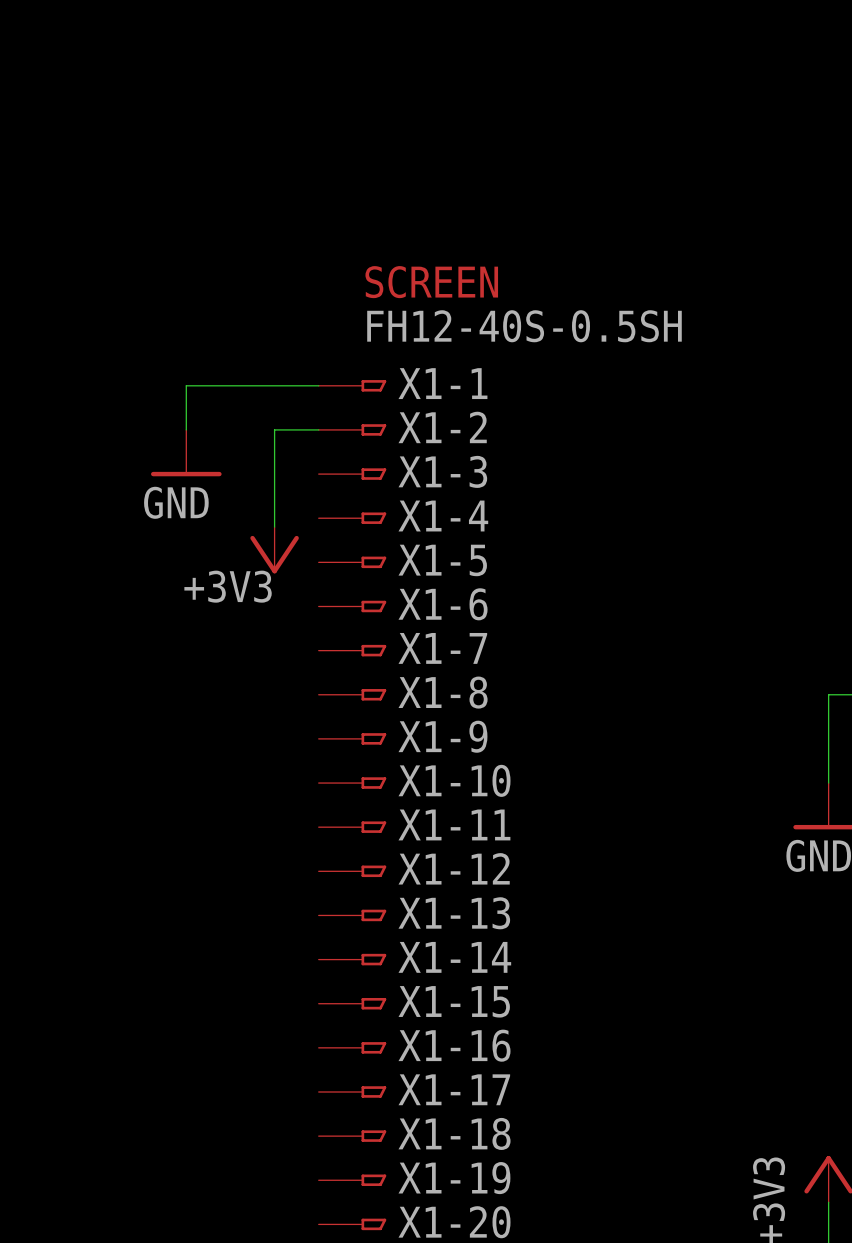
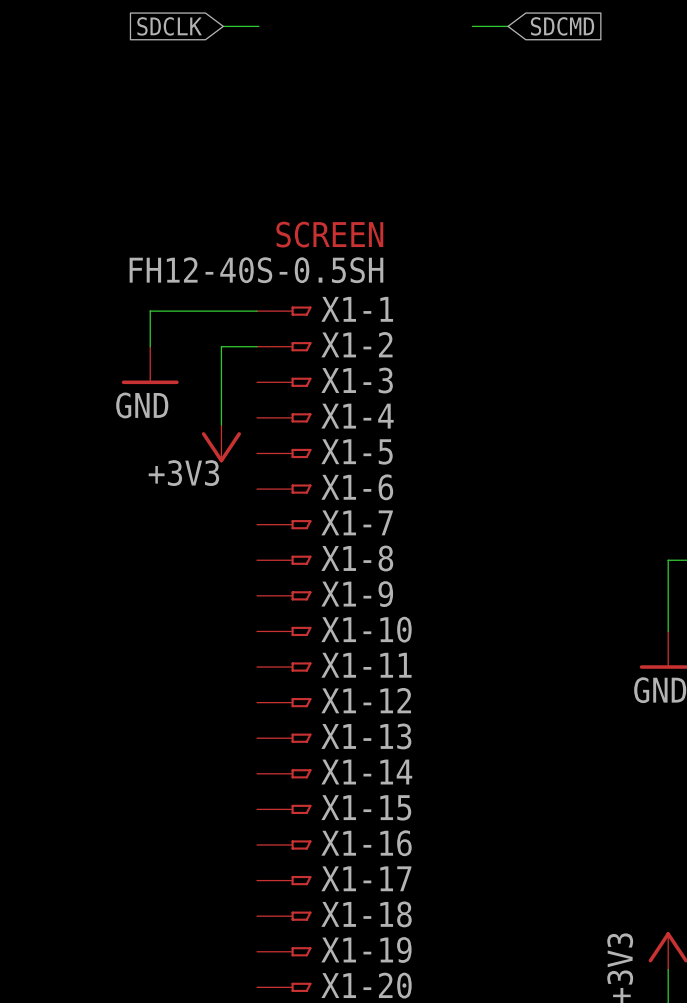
global label: none -> SDCLK (169, 26)
wire: none -> (223, 26) (258, 26)
wire: none -> (472, 26) (508, 26)
global label: none -> SDCMD (562, 26)
text position: SCREEN (431, 282) -> SCREEN (329, 234)
X1-1 value position: FH12-40S-0.5SH (524, 326) -> FH12-40S-0.5SH (256, 270)

